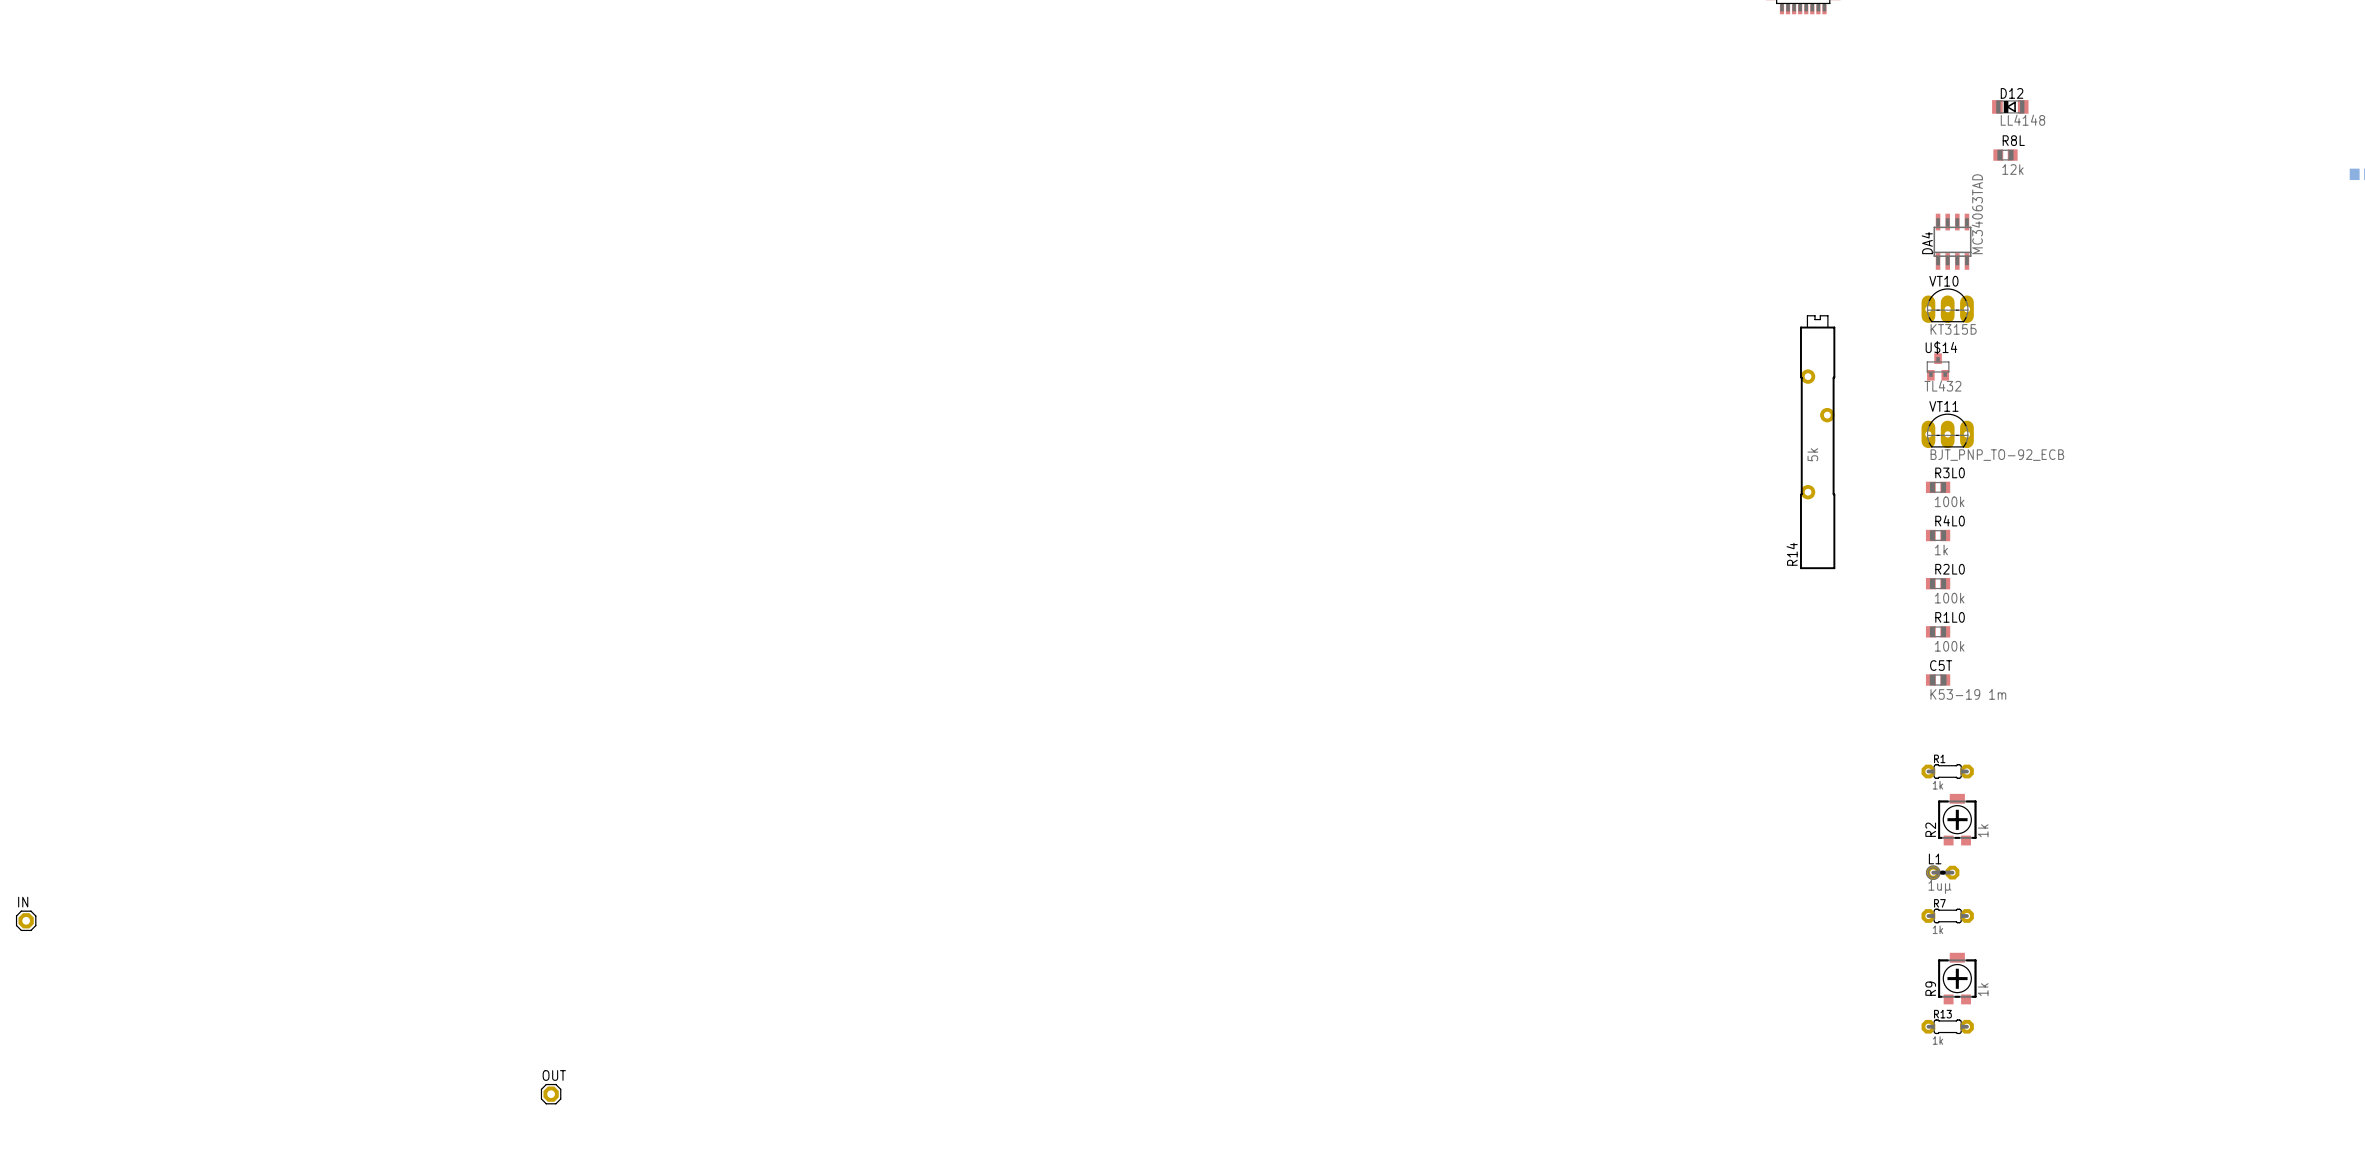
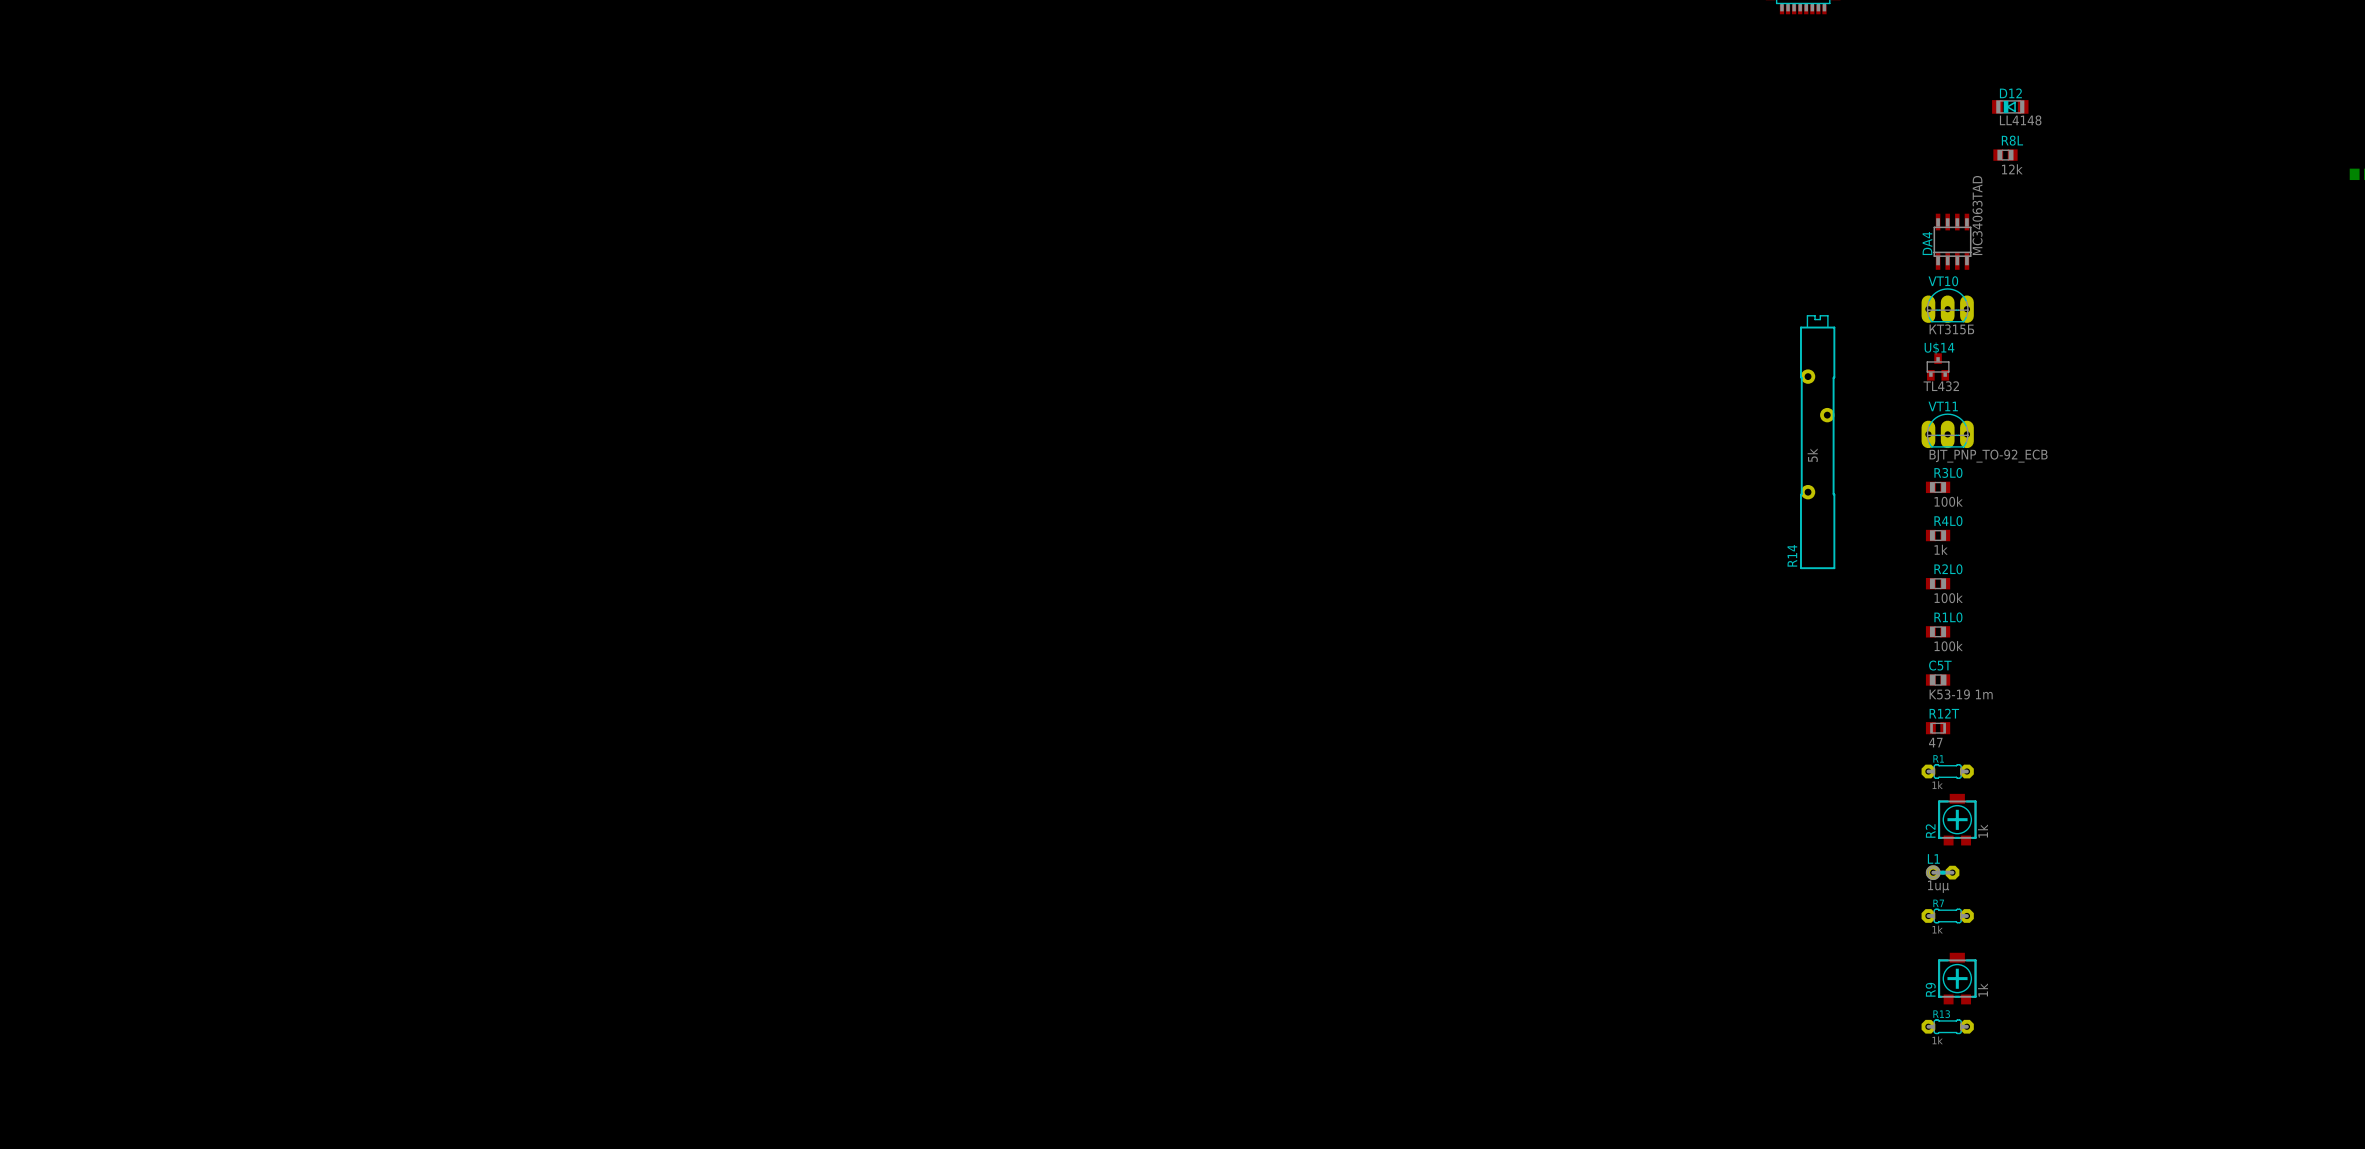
R12T: none -> 47 (1938, 728)
IN: (26, 920) -> none
OUT: (551, 1094) -> none

